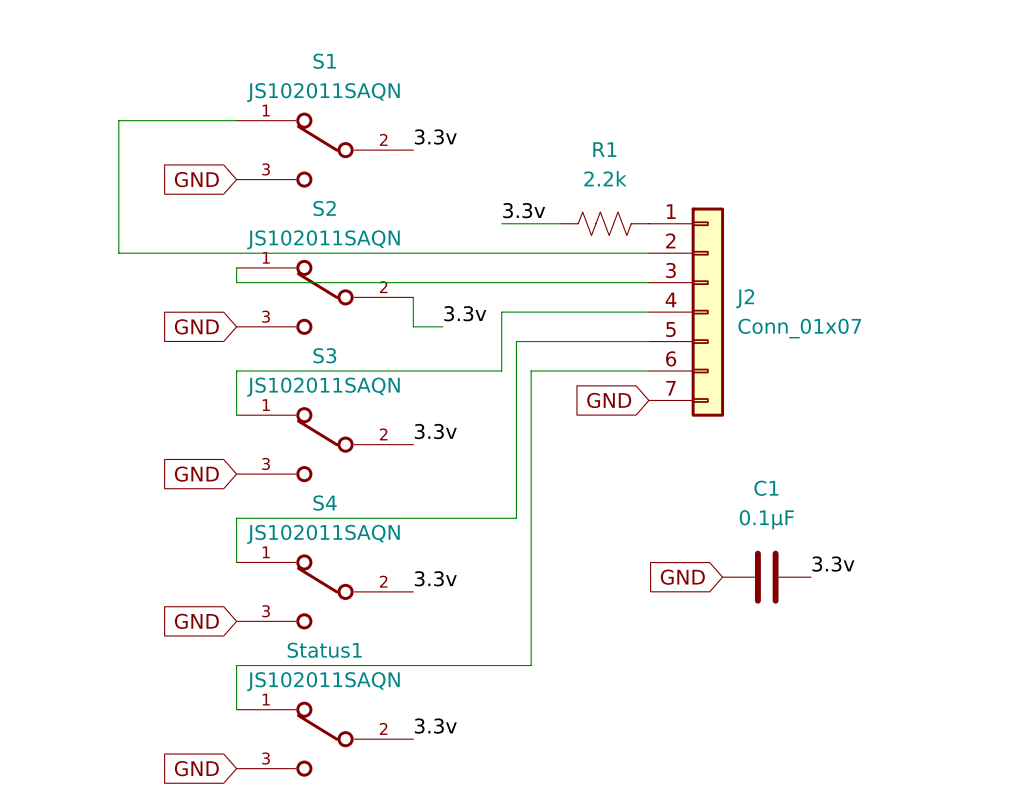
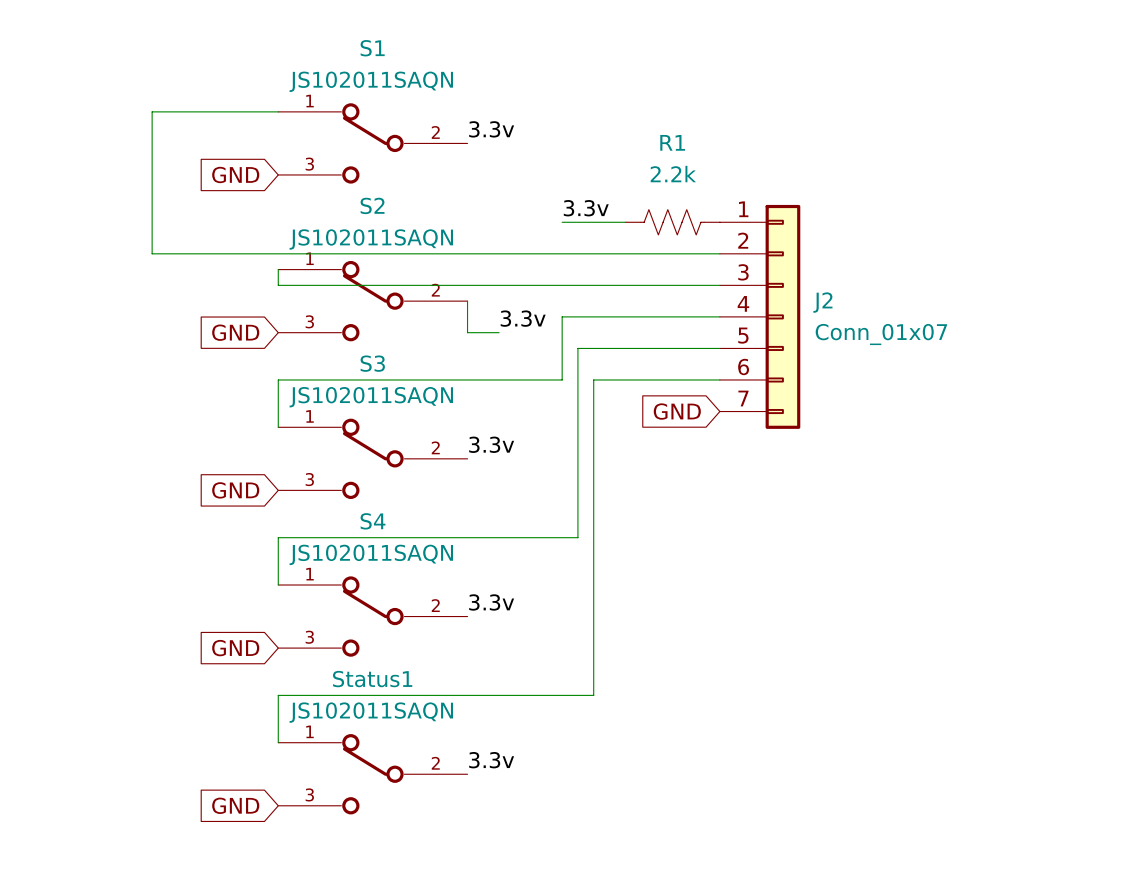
label: 3.3v (833, 564) -> none
global label: GND (682, 577) -> none
C1: 0.1μF (766, 577) -> none

